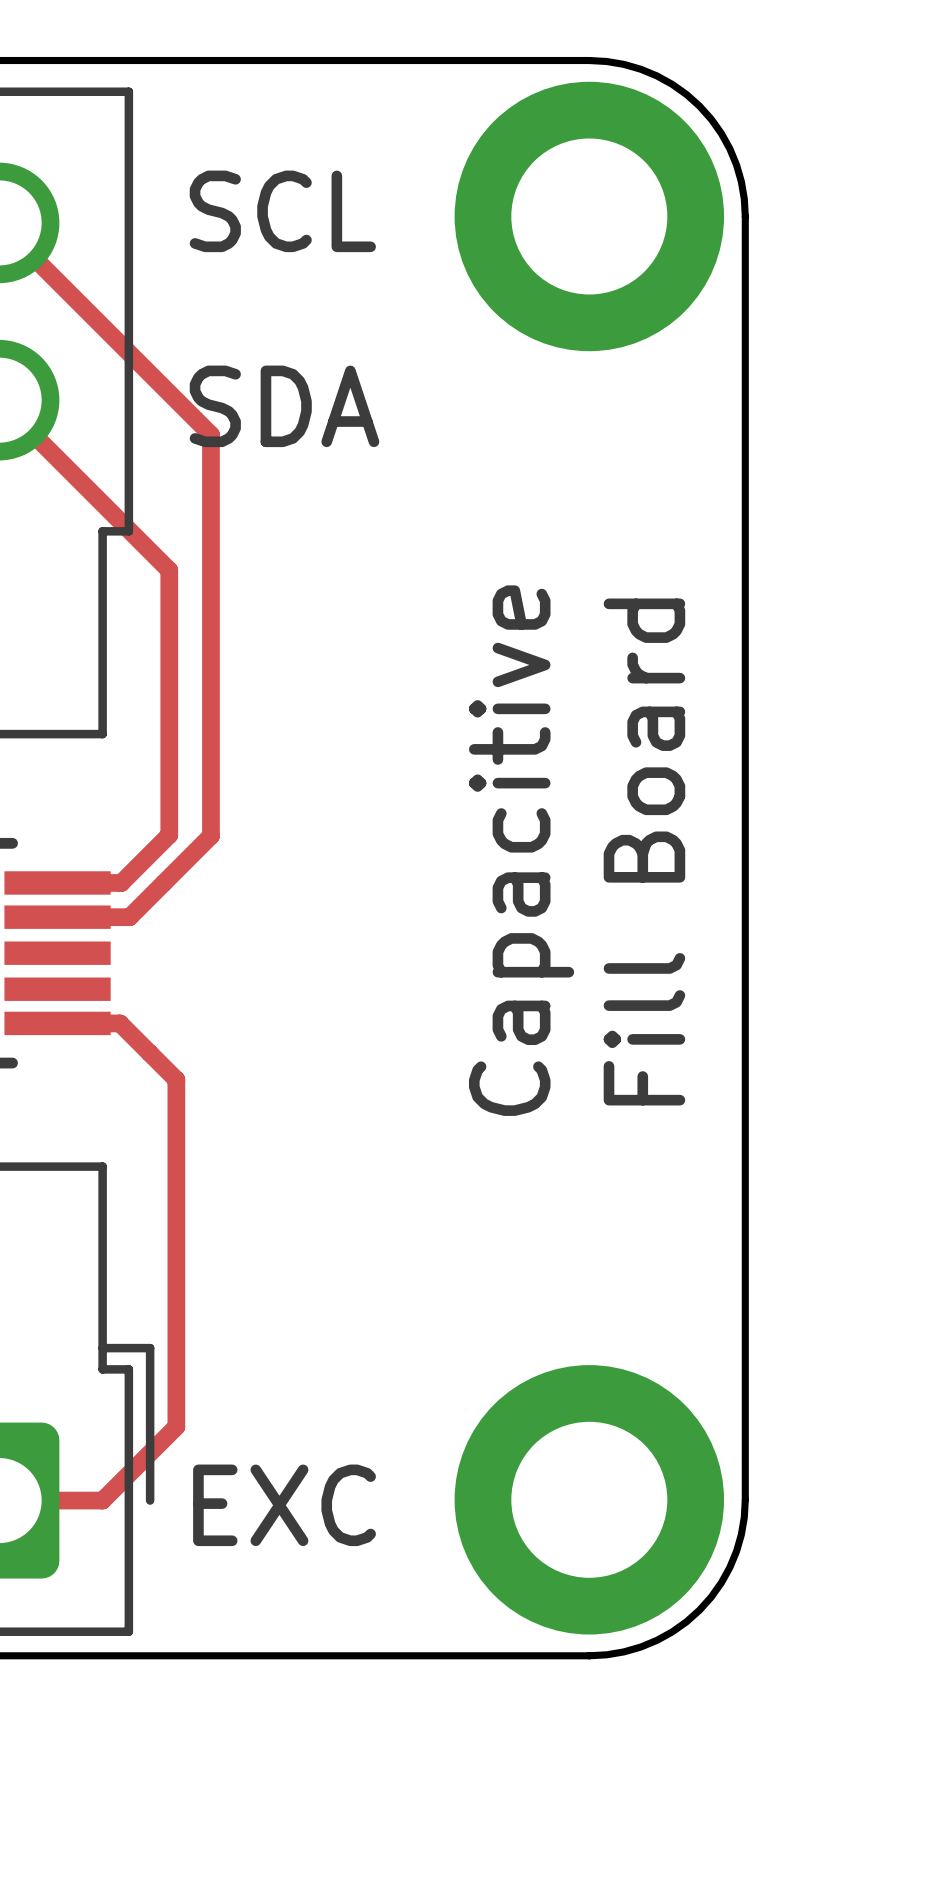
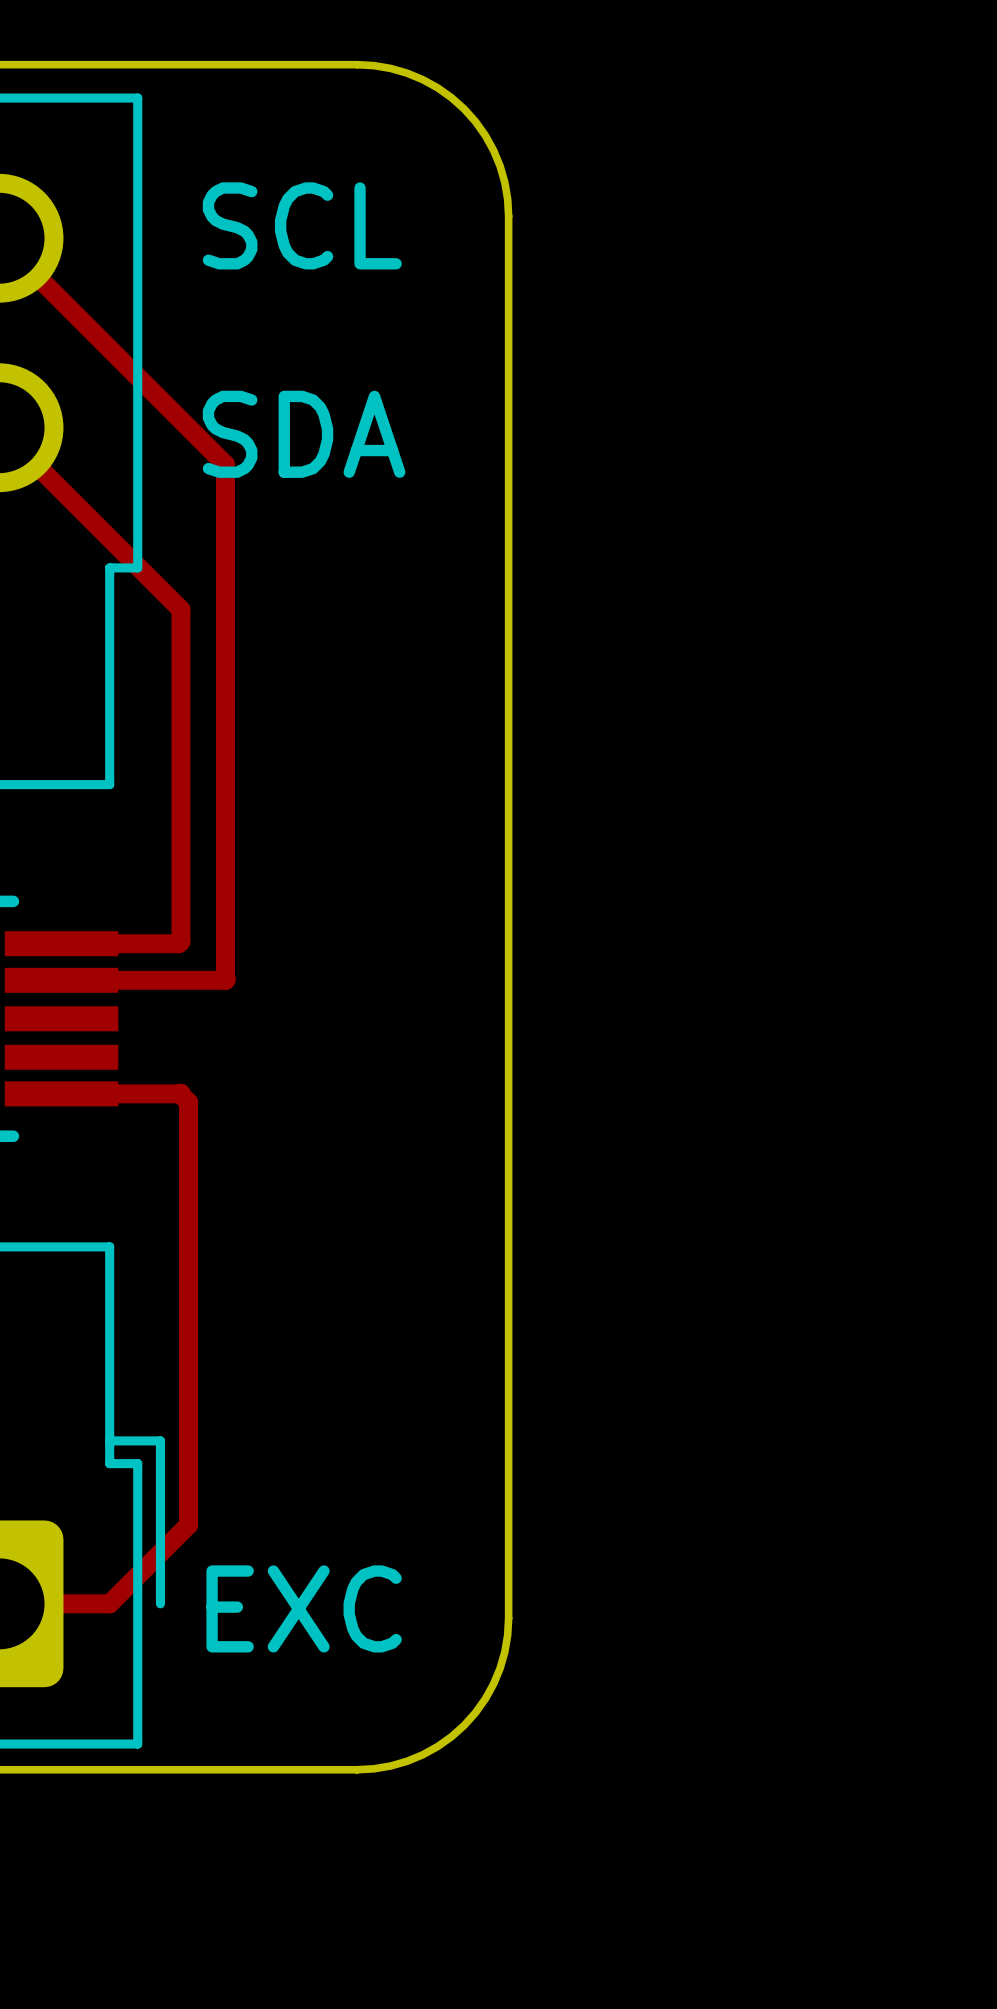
board edge: (334, 60) (589, 60) (606, 61) (640, 69) (672, 84) (686, 94) (711, 119) (721, 133) (736, 164) (744, 199) (745, 216) (745, 1499) (741, 1534) (729, 1567) (711, 1597) (686, 1621) (672, 1631) (640, 1647) (606, 1654) (589, 1655) (334, 1655) -> (357, 64) (390, 68) (407, 73) (437, 87) (464, 109) (485, 135) (500, 166) (504, 182) (508, 216) (507, 1635) (500, 1668) (493, 1683) (475, 1712) (451, 1736) (422, 1754) (407, 1761) (390, 1765) (357, 1769)
part: (589, 216) -> none
top track: (169, 835) (121, 882) -> (180, 892) (180, 941) (178, 943) (129, 943)
top track: (210, 835) (129, 917) -> (225, 893) (225, 980) (138, 980)
text: Capacitive (521, 850) -> none
text: Fill Board (644, 851) -> none
top track: (120, 1023) (176, 1079) -> (128, 1093) (180, 1093) (188, 1102) (188, 1154)
part: (589, 1499) -> none

